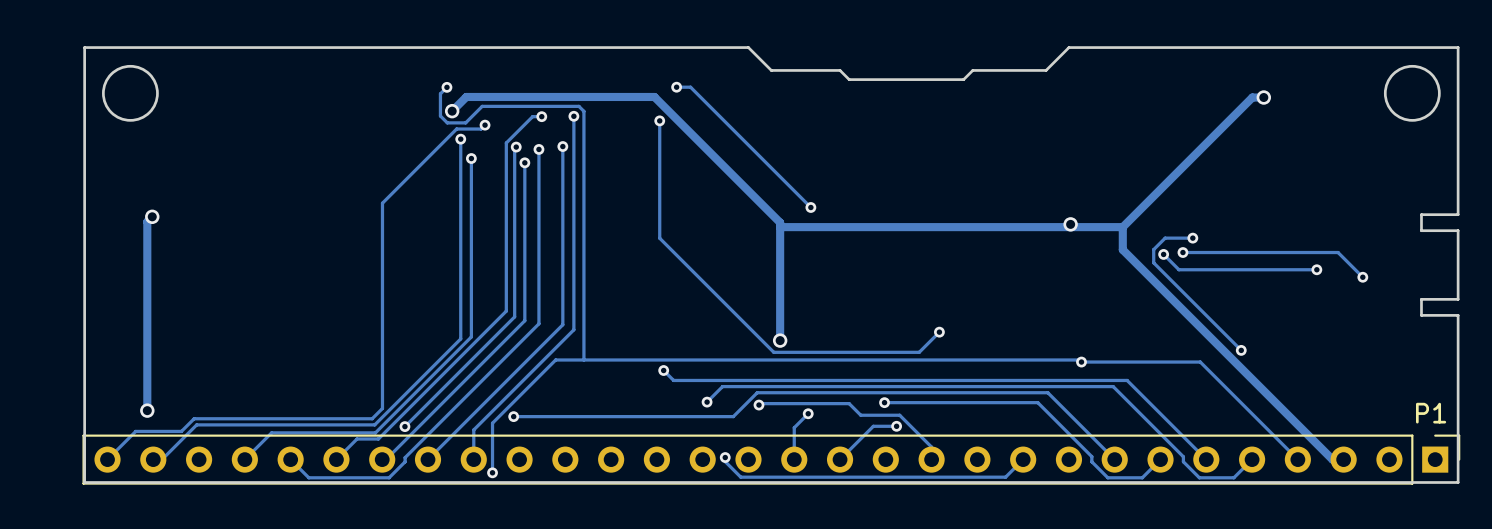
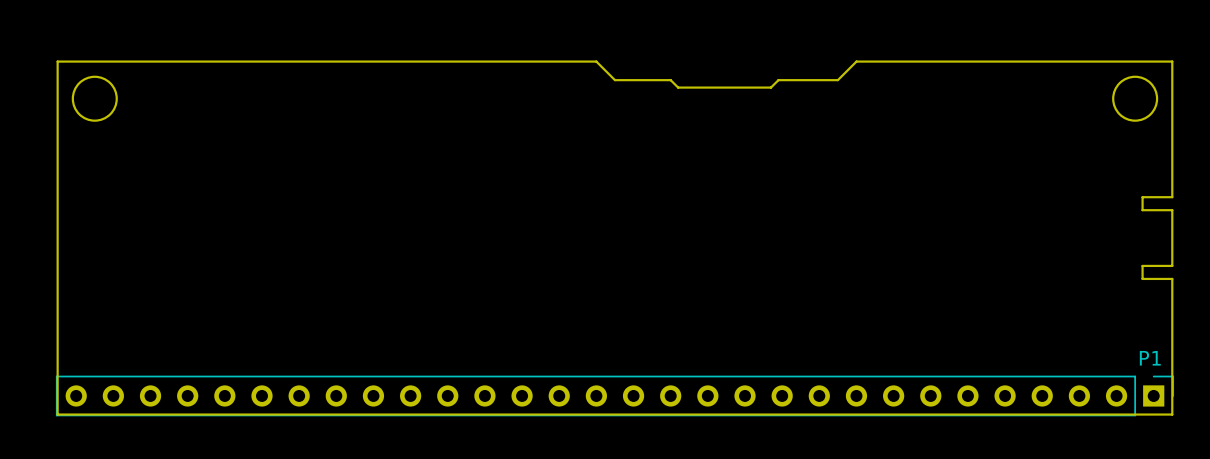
track: (446, 87) (440, 93) (440, 116) (447, 122) (465, 122) (482, 106) (578, 106) (583, 111) (583, 359) -> none
via: (446, 87) -> none
track: (676, 87) (690, 87) (810, 207) -> none
via: (676, 87) -> none
track: (1263, 97) (1252, 97) (1122, 227) -> none
via: (1263, 97) -> none
track: (452, 111) (466, 96) (654, 96) (780, 222) (780, 340) -> none
via: (452, 111) -> none
track: (541, 116) (532, 116) (506, 142) (506, 311) (378, 438) (357, 438) (336, 459) -> none
via: (541, 116) -> none
track: (573, 116) (573, 329) (473, 429) (473, 459) -> none
via: (573, 116) -> none
track: (659, 120) (659, 238) (773, 352) (919, 352) (939, 332) -> none
via: (659, 120) -> none
track: (485, 125) (481, 129) (456, 129) (382, 203) (382, 408) (372, 418) (194, 418) (181, 431) (135, 431) (107, 459) -> none
via: (485, 125) -> none
track: (460, 139) (460, 338) (374, 424) (196, 424) (161, 459) (153, 459) -> none
via: (460, 139) -> none
track: (562, 146) (562, 324) (428, 459) -> none
via: (562, 146) -> none
track: (516, 147) (514, 148) (514, 316) (404, 426) -> none
via: (516, 147) -> none
track: (538, 149) (538, 323) (405, 457) (405, 461) (389, 477) (308, 477) (290, 459) -> none
via: (538, 149) -> none
track: (471, 158) (471, 336) (375, 432) (271, 432) (244, 459) -> none
via: (471, 158) -> none
track: (524, 162) (524, 320) (385, 459) (382, 459) -> none
via: (524, 162) -> none
via: (810, 207) -> none
track: (152, 216) (147, 221) (147, 410) -> none
via: (152, 216) -> none
via: (1070, 224) -> none
track: (1122, 227) (1122, 249) (1332, 459) (1343, 459) -> none
track: (1122, 227) (780, 227) -> none
track: (1192, 238) (1165, 238) (1153, 249) (1153, 262) (1241, 350) -> none
via: (1192, 238) -> none
track: (1182, 252) (1338, 252) (1362, 277) -> none
via: (1182, 252) -> none
track: (1163, 254) (1178, 269) (1316, 269) -> none
via: (1163, 254) -> none
via: (1316, 269) -> none
via: (1362, 277) -> none
via: (939, 332) -> none
via: (780, 340) -> none
via: (1241, 350) -> none
via: (1081, 362) -> none
track: (663, 370) (673, 380) (1127, 380) (1206, 459) -> none
via: (663, 370) -> none
track: (707, 402) (722, 386) (1113, 386) (1183, 456) (1183, 461) (1199, 477) (1233, 477) (1252, 459) -> none
via: (707, 402) -> none
track: (884, 402) (1037, 402) (1091, 456) (1091, 461) (1107, 477) (1142, 477) (1160, 459) -> none
via: (884, 402) -> none
track: (758, 405) (849, 403) (860, 415) (899, 415) (931, 447) (931, 459) -> none
via: (758, 405) -> none
via: (147, 410) -> none
track: (808, 413) (794, 427) (794, 459) -> none
via: (808, 413) -> none
track: (513, 416) (733, 416) (757, 392) (1047, 392) (1114, 459) -> none
via: (513, 416) -> none
via: (404, 426) -> none
track: (896, 426) (873, 426) (840, 459) -> none
via: (896, 426) -> none
track: (725, 457) (725, 461) (740, 477) (1005, 477) (1023, 459) -> none
via: (725, 457) -> none
track: (1297, 459) (1200, 362) (1081, 362) (1079, 359) (555, 359) (492, 423) (492, 472) -> none
via: (492, 472) -> none

